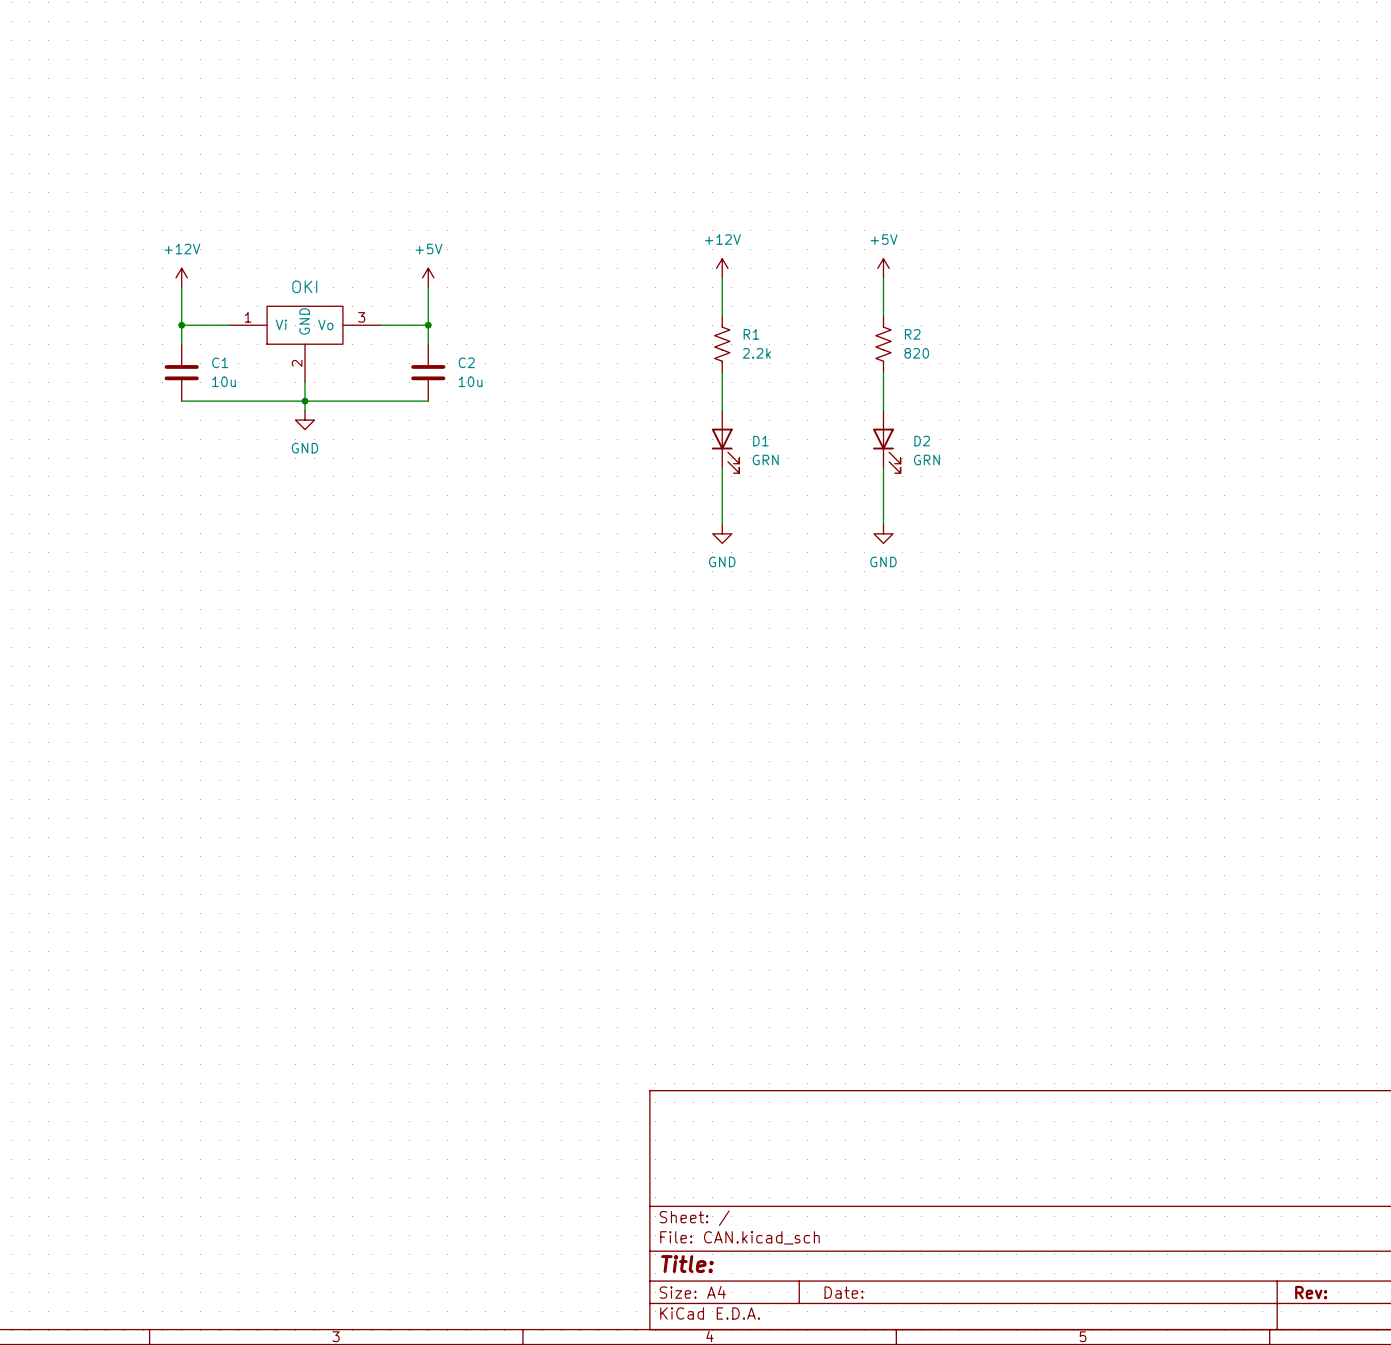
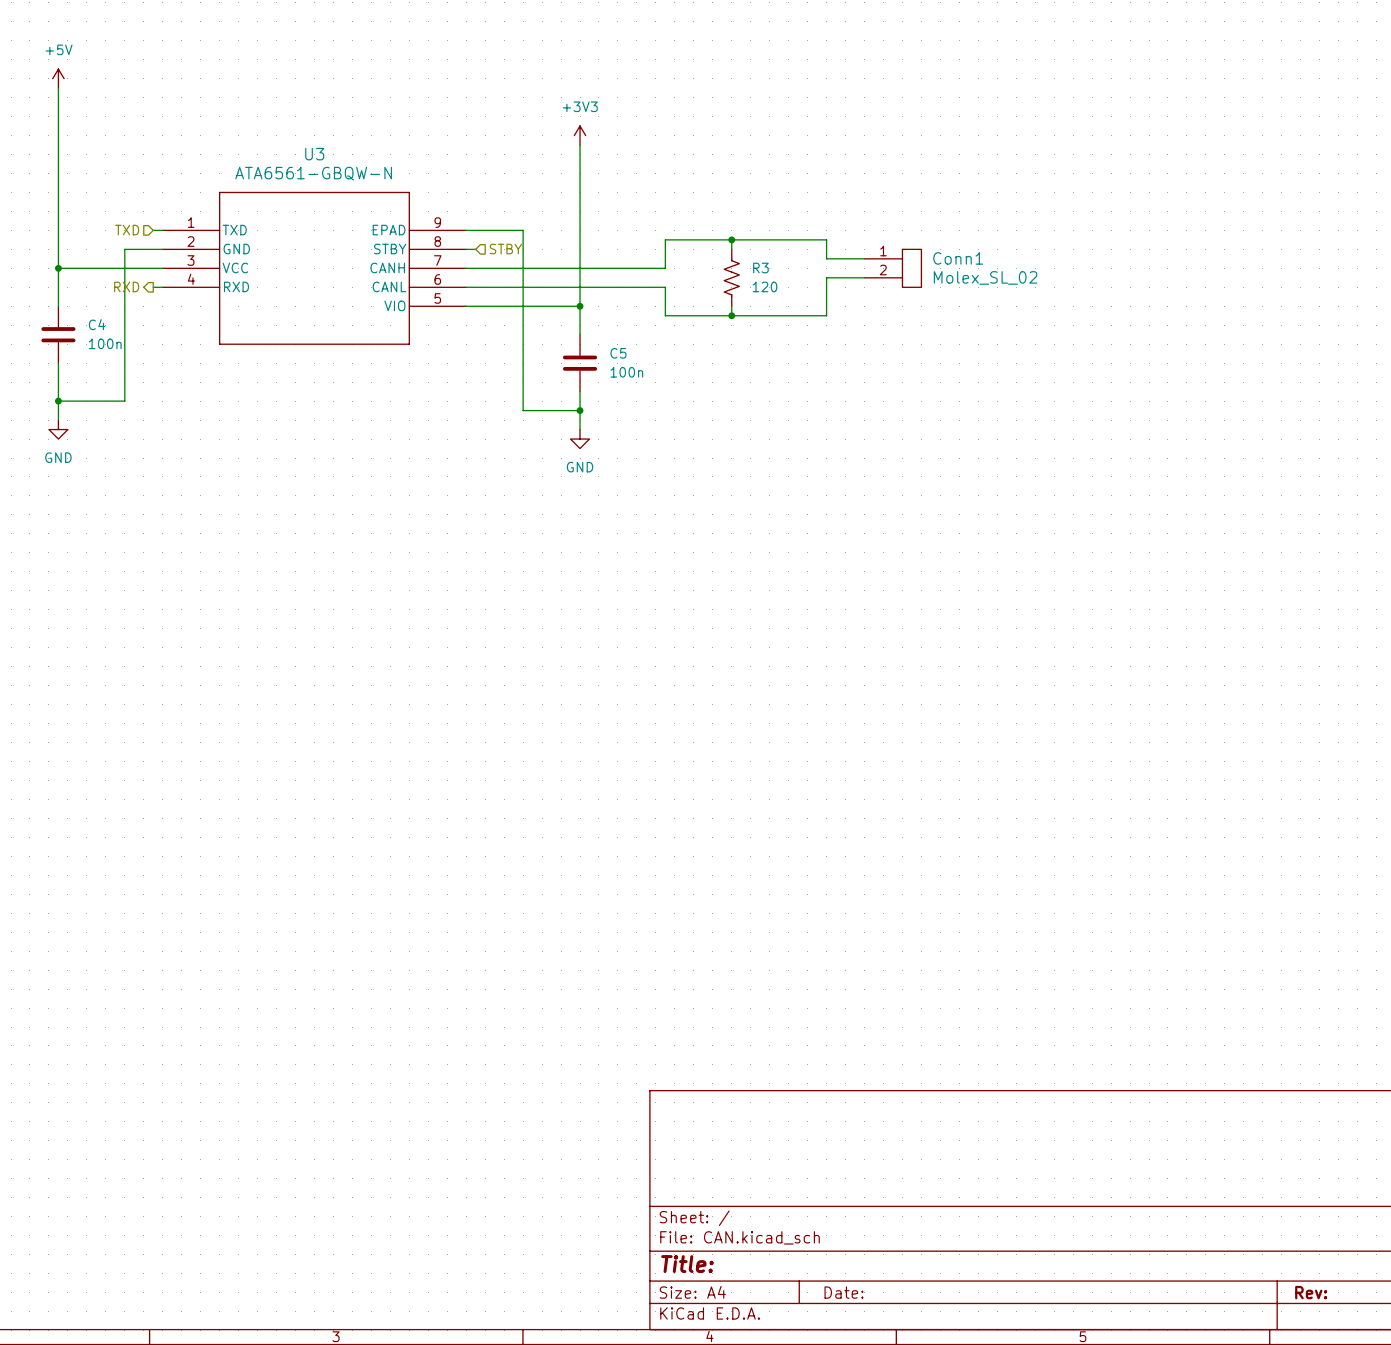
power symbol: none -> +5V (58, 78)
wire: none -> (58, 88) (58, 306)
power symbol: none -> +3V3 (580, 135)
wire: none -> (580, 145) (580, 334)
hierarchical label: none -> TXD (127, 230)
wire: none -> (153, 230) (162, 230)
wire: none -> (466, 230) (523, 230) (523, 410) (580, 410)
wire: none -> (731, 239) (731, 249)
junction: none -> (731, 239)
wire: none -> (162, 249) (124, 249) (124, 401) (58, 401)
wire: none -> (466, 249) (475, 249)
hierarchical label: none -> STBY (505, 249)
wire: none -> (864, 258) (826, 258) (826, 239) (665, 239) (665, 268) (466, 268)
wire: none -> (58, 268) (162, 268)
junction: none -> (58, 268)
U3: none -> ATA6561-GBQW-N (314, 268)
power symbol: +12V (722, 268) -> none
power symbol: +5V (883, 268) -> none
Conn1: none -> Molex_SL_02 (892, 268)
power symbol: +12V (181, 277) -> none
power symbol: +5V (428, 277) -> none
wire: (722, 277) (722, 315) -> none
R3: none -> 120 (731, 277)
wire: none -> (864, 277) (826, 277) (826, 315) (665, 315) (665, 287) (466, 287)
wire: (883, 277) (883, 315) -> none
hierarchical label: none -> RXD (126, 286)
wire: none -> (153, 287) (162, 287)
wire: (181, 287) (181, 344) -> (58, 363) (58, 420)
wire: (428, 287) (428, 344) -> none
wire: none -> (466, 306) (580, 306)
junction: none -> (580, 306)
wire: none -> (731, 306) (731, 315)
junction: none -> (731, 315)
wire: (181, 325) (229, 325) -> none
junction: (181, 325) -> none
wire: (380, 325) (428, 325) -> none
junction: (428, 325) -> none
C4: none -> 100n (58, 334)
part: OKI (304, 344) -> none
R1: 2.2k (722, 344) -> none
R2: 820 (883, 344) -> none
C5: none -> 100n (580, 363)
C1: 10u (181, 372) -> none
C2: 10u (428, 372) -> none
wire: (722, 372) (722, 410) -> (580, 391) (580, 429)
wire: (883, 372) (883, 410) -> none
wire: (304, 382) (304, 410) -> none
junction: none -> (58, 401)
wire: (181, 401) (428, 401) -> none
junction: (304, 401) -> none
junction: none -> (580, 410)
power symbol: GND (304, 420) -> none
power symbol: none -> GND (58, 429)
power symbol: none -> GND (580, 439)
D1: GRN (725, 441) -> none
D2: GRN (886, 441) -> none
wire: (722, 467) (722, 524) -> none
wire: (883, 467) (883, 524) -> none
power symbol: GND (722, 533) -> none
power symbol: GND (883, 533) -> none

